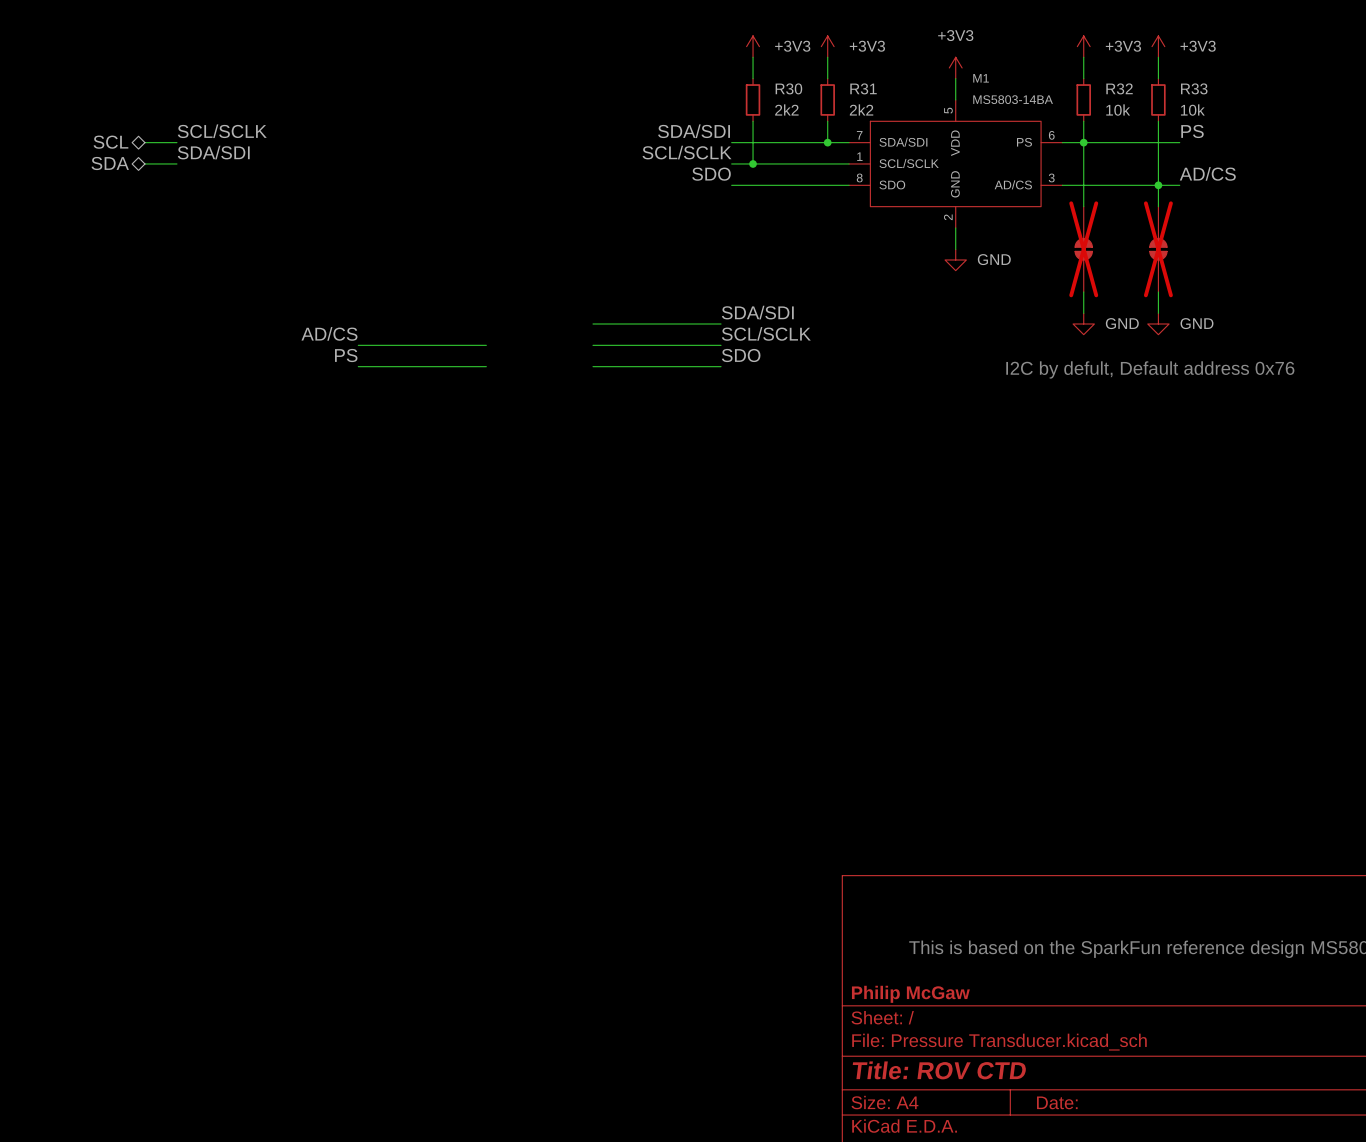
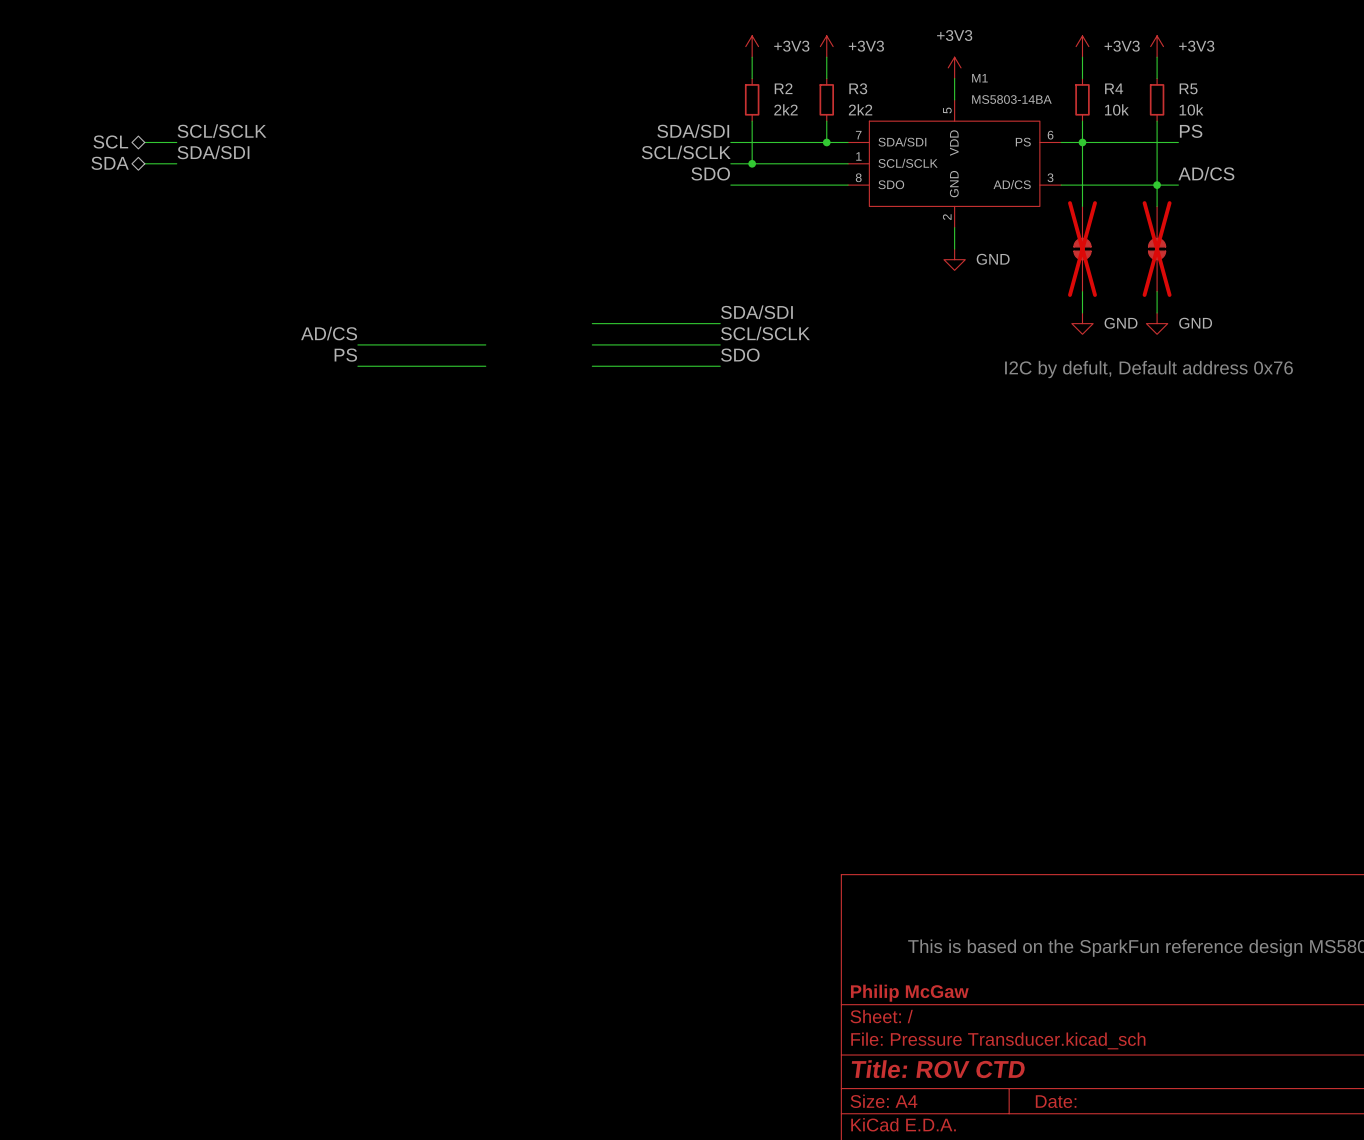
R30 name: R30 (788, 88) -> R2 (783, 88)
R31 name: R31 (863, 88) -> R3 (858, 88)
R32 name: R32 (1119, 88) -> R4 (1114, 88)
R33 name: R33 (1194, 88) -> R5 (1188, 88)

